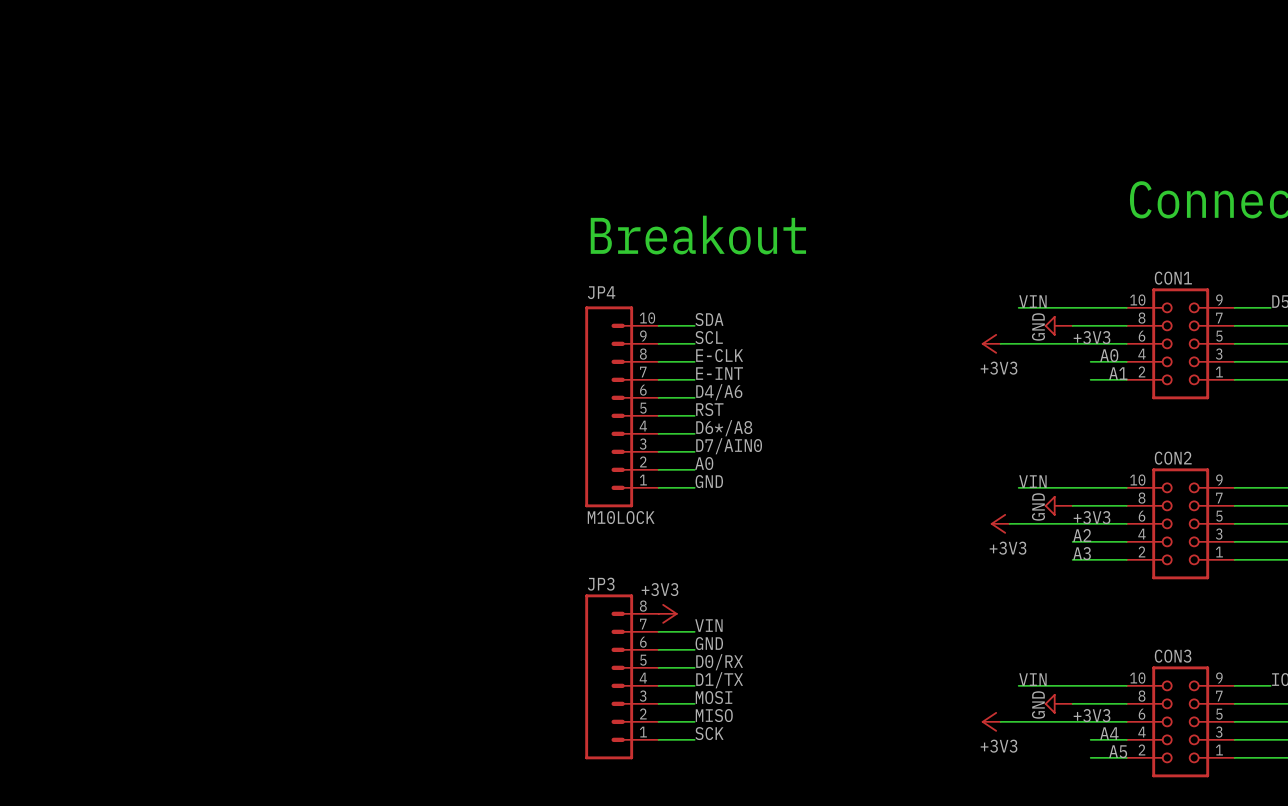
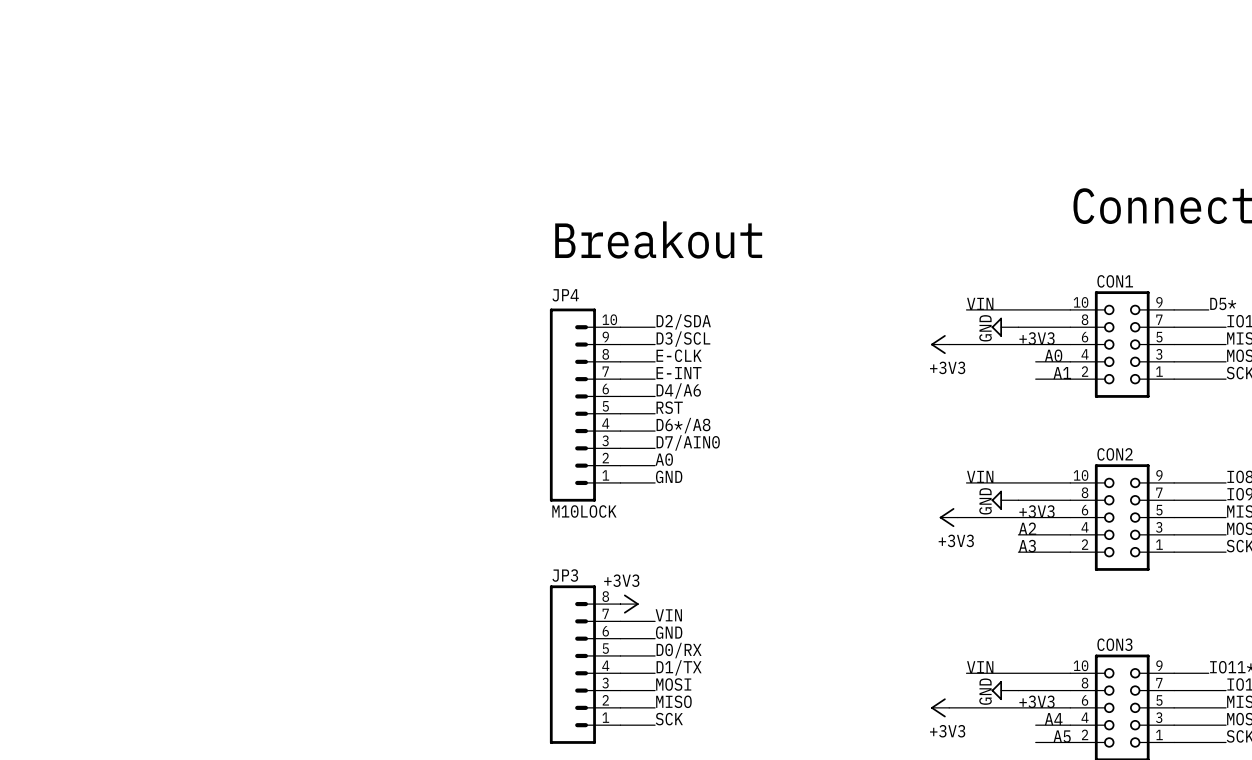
label: SDA (709, 319) -> D2/SDA (683, 321)
label: SCL (709, 337) -> D3/SCL (683, 339)

